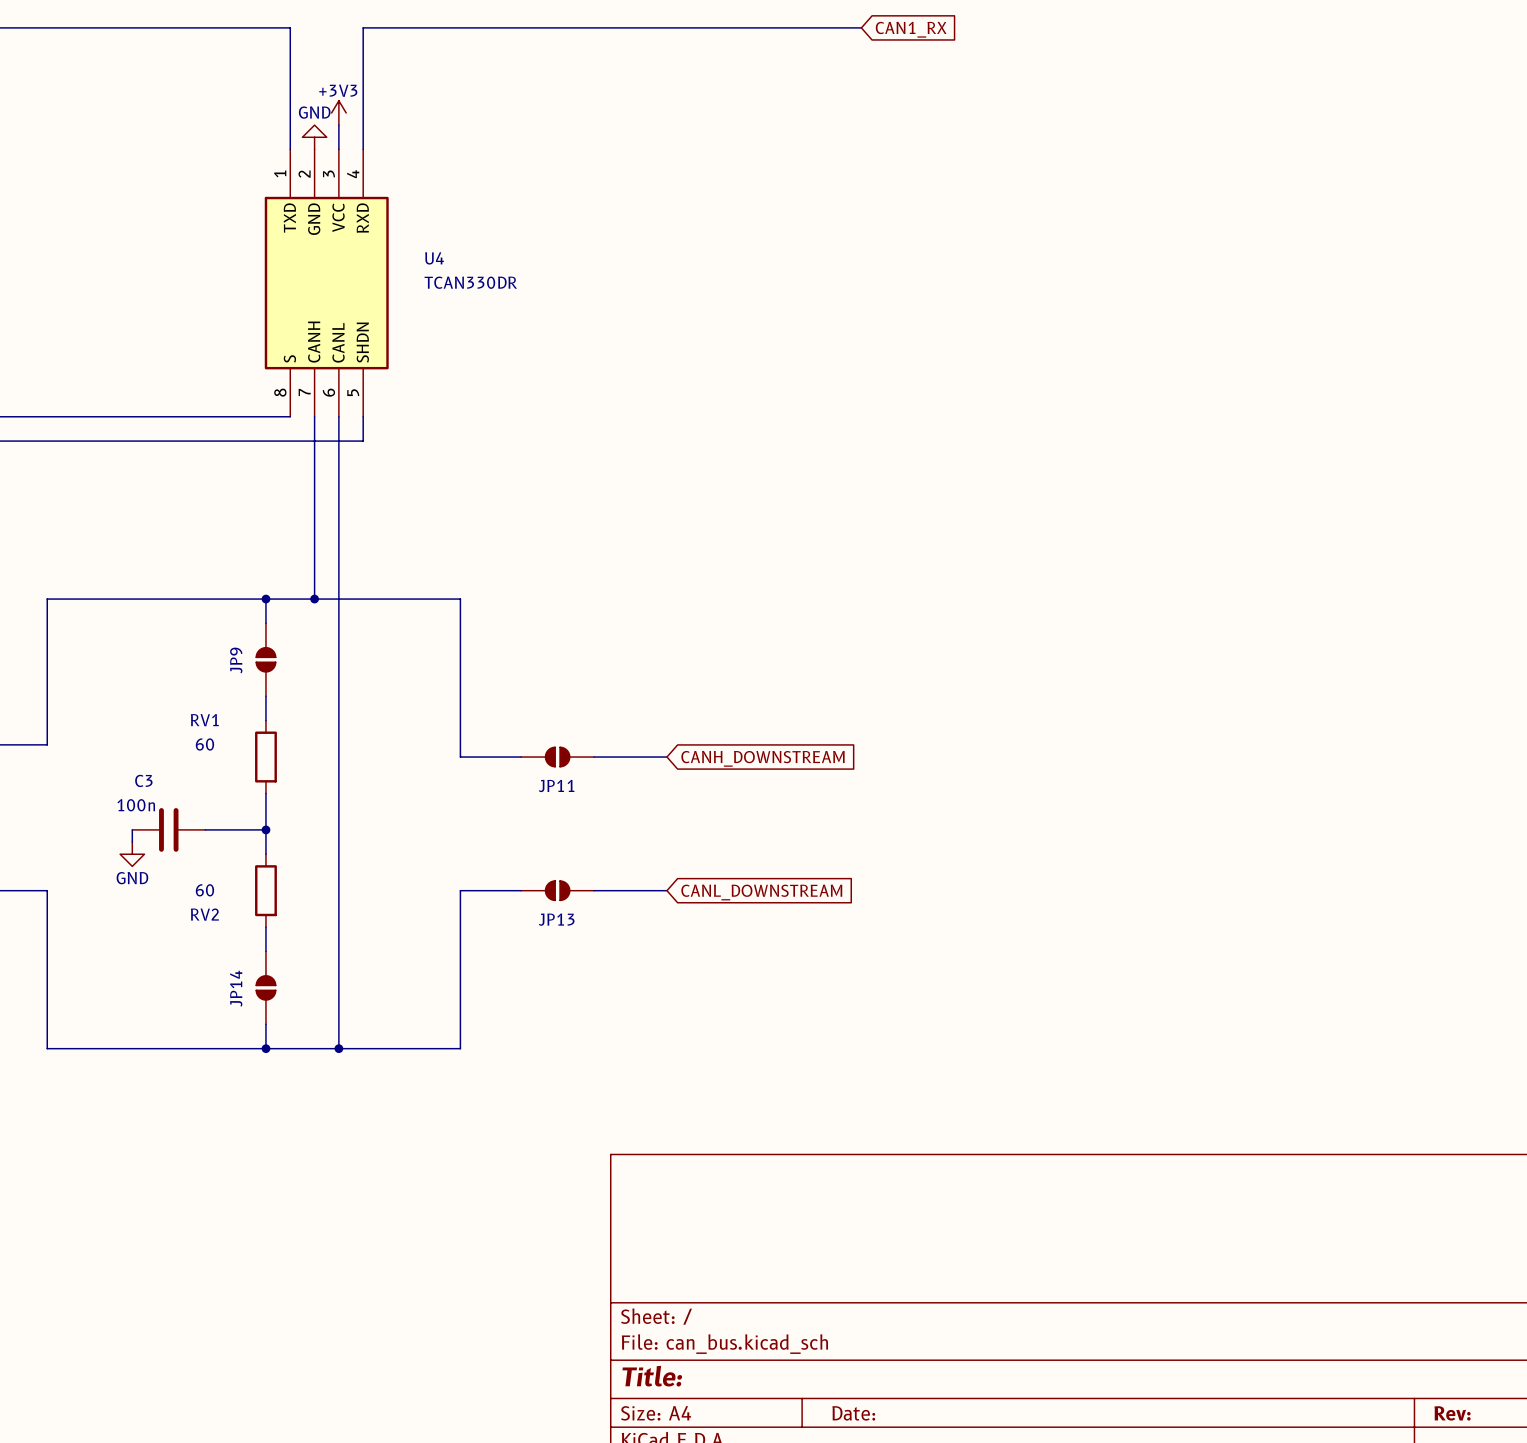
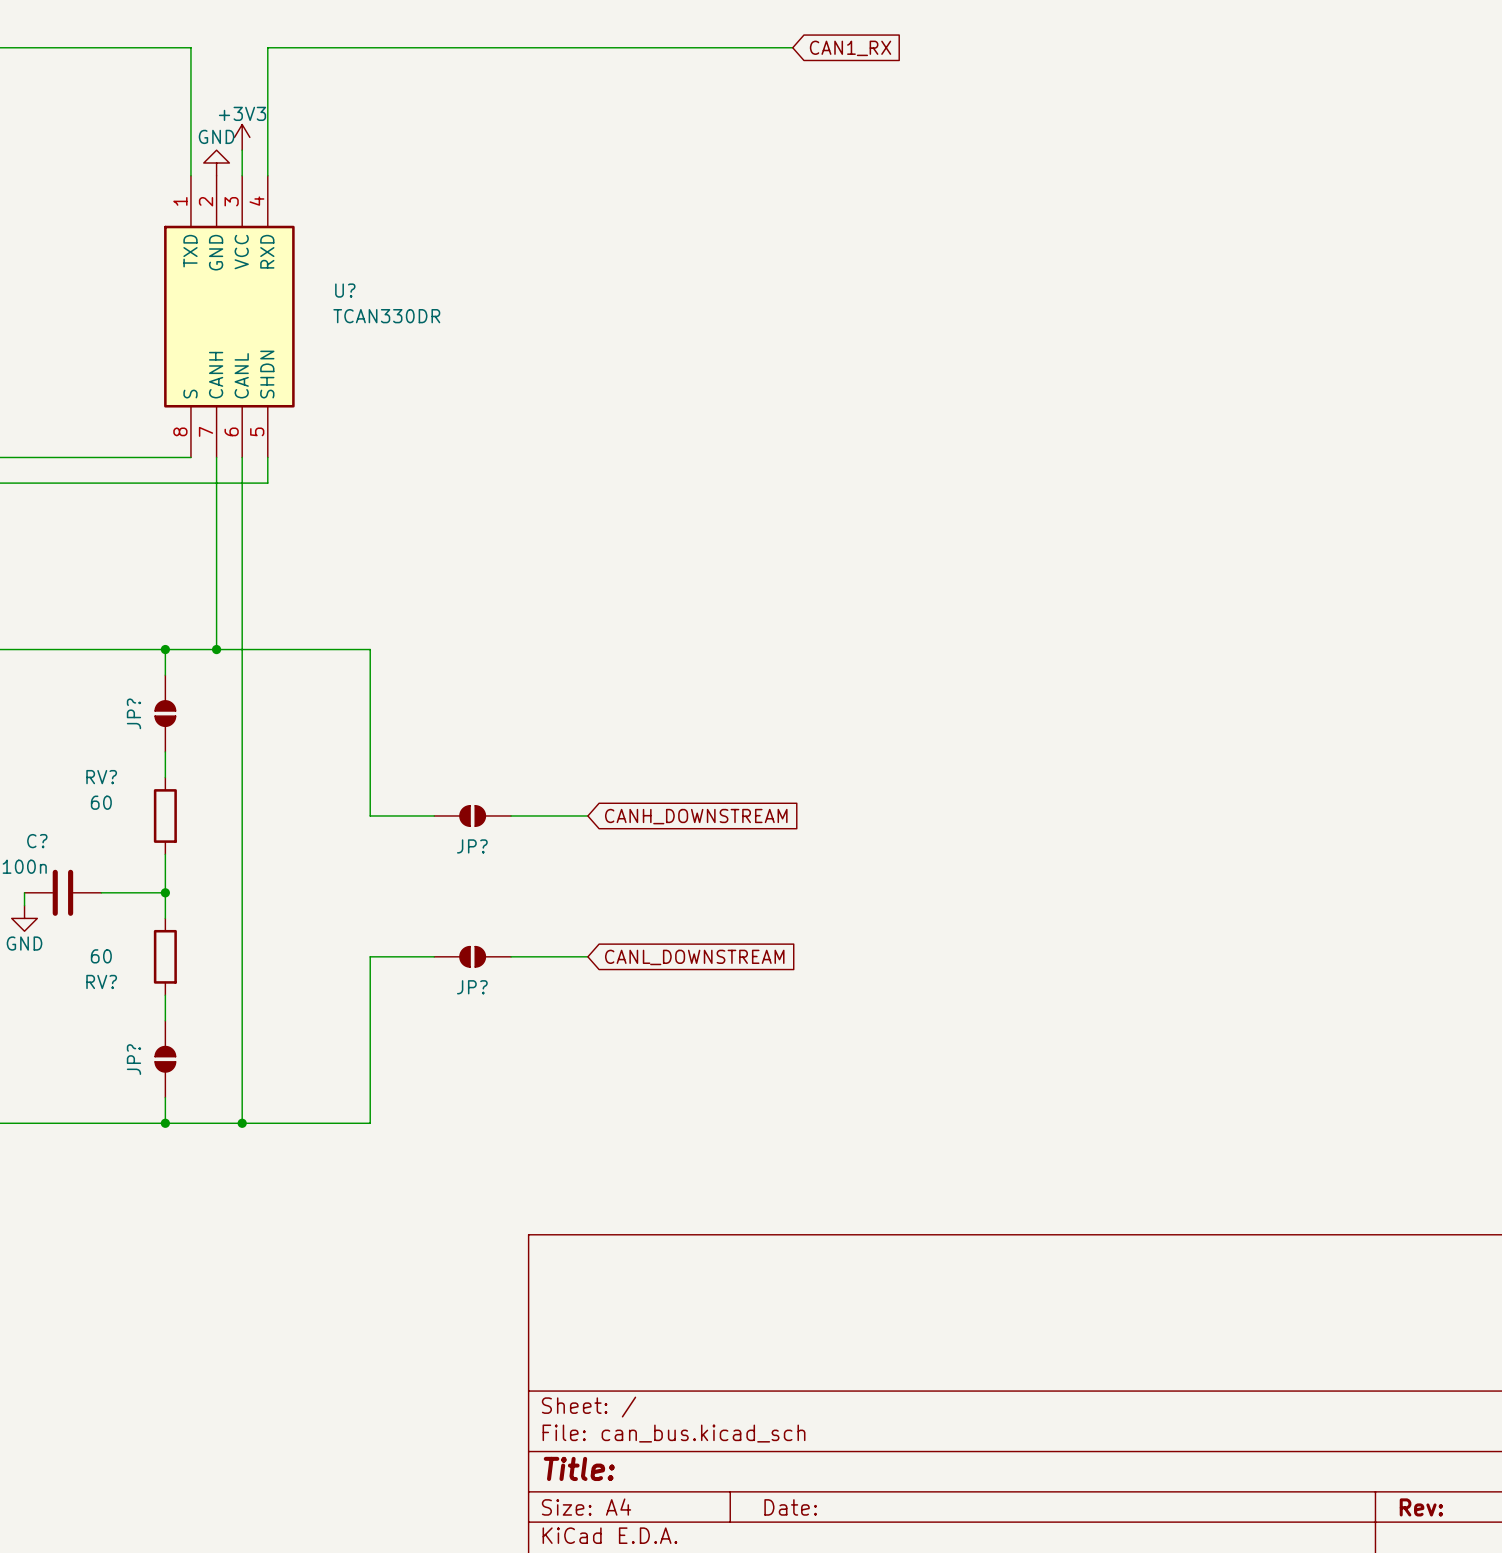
U4 name: U4 (434, 258) -> U? (345, 290)
JP9 name: JP9 (236, 660) -> JP? (133, 713)
RV1 name: RV1 (204, 720) -> RV? (101, 777)
C3 name: C3 (143, 780) -> C? (37, 841)
JP11 name: JP11 (556, 785) -> JP? (472, 846)
RV2 name: RV2 (204, 914) -> RV? (101, 981)
JP13 name: JP13 (556, 919) -> JP? (472, 987)
JP14 name: JP14 (236, 988) -> JP? (133, 1059)

